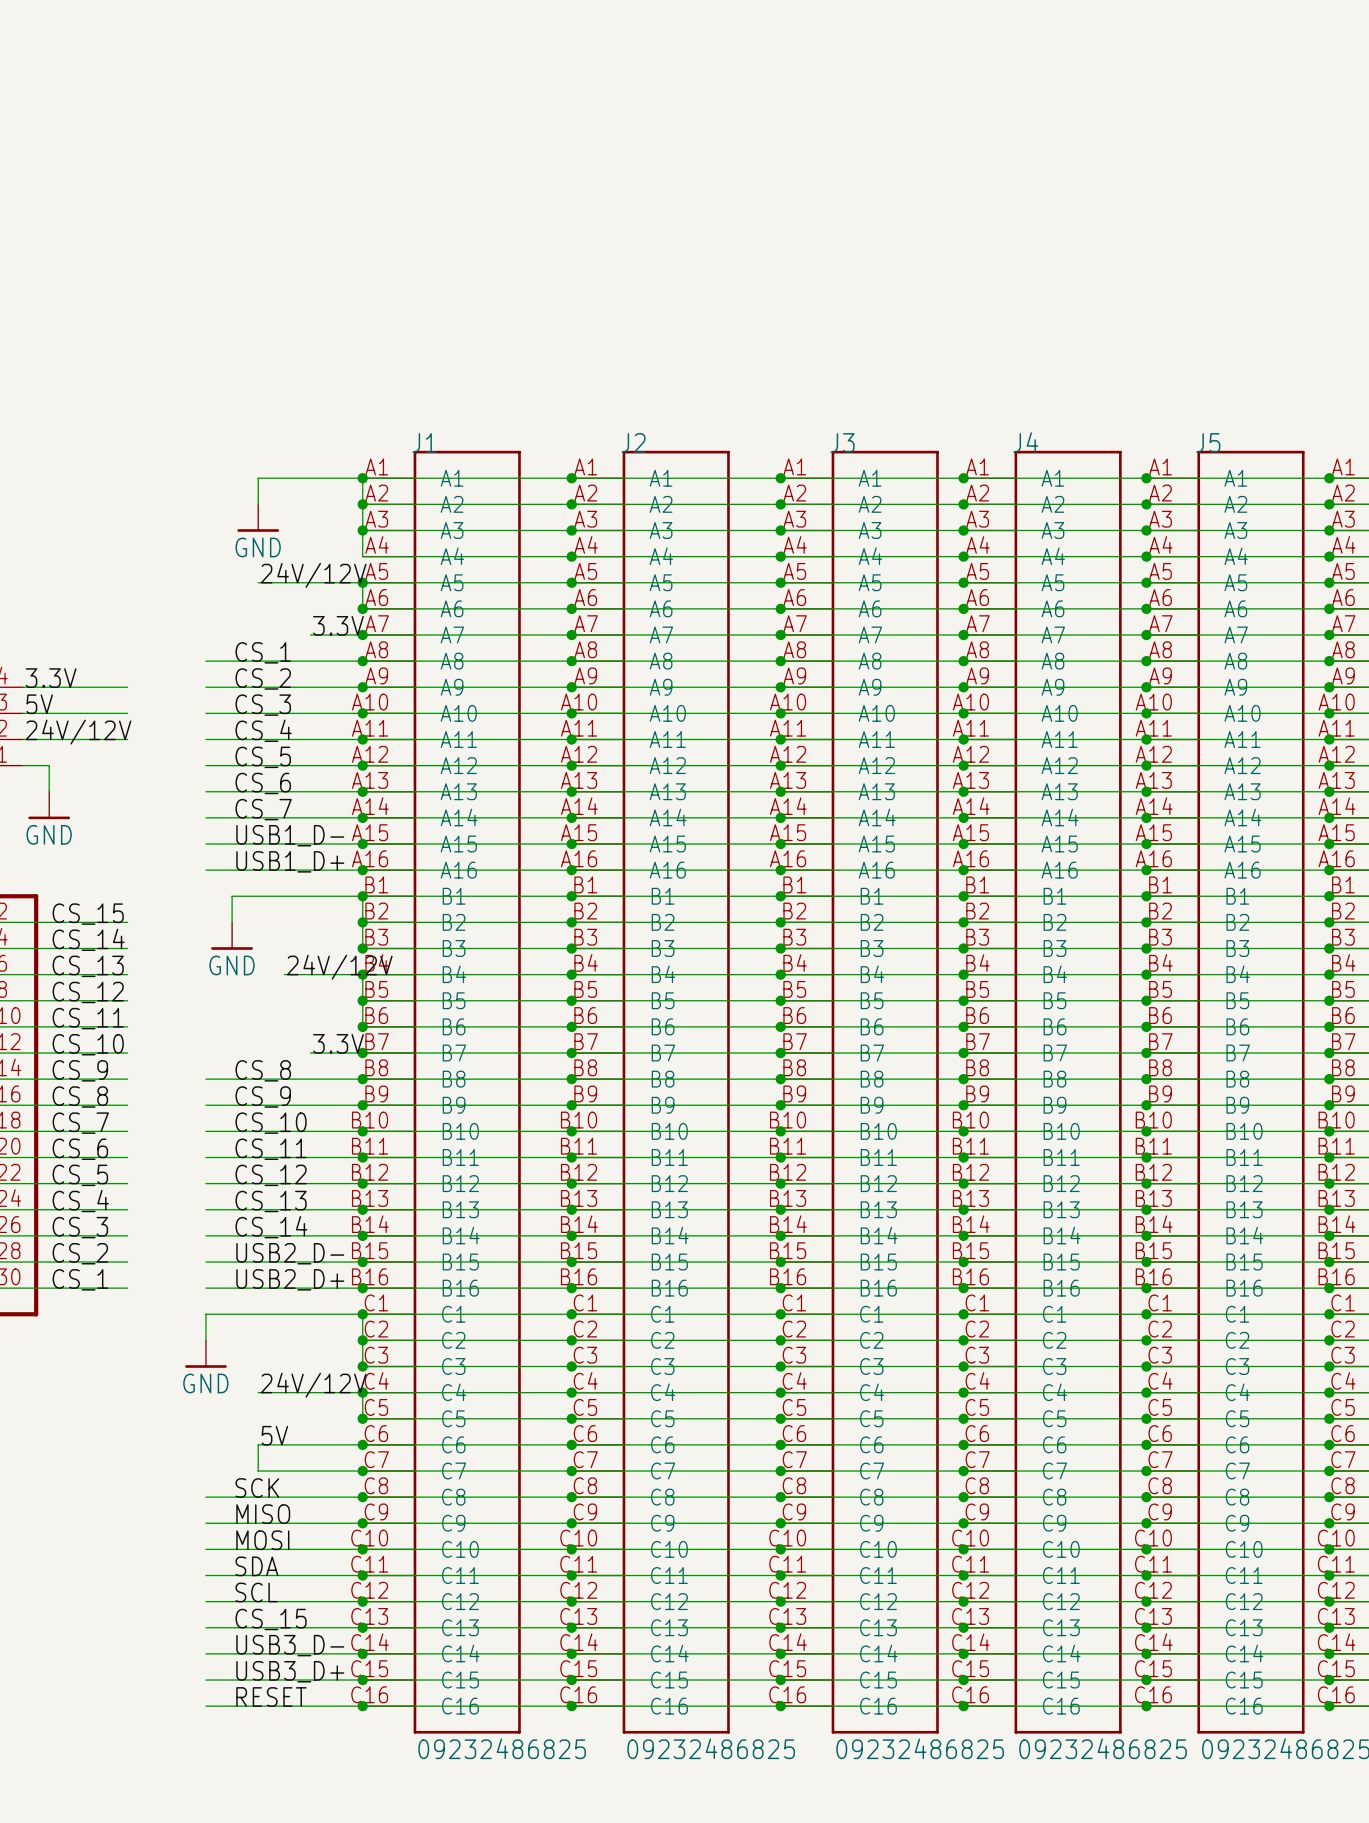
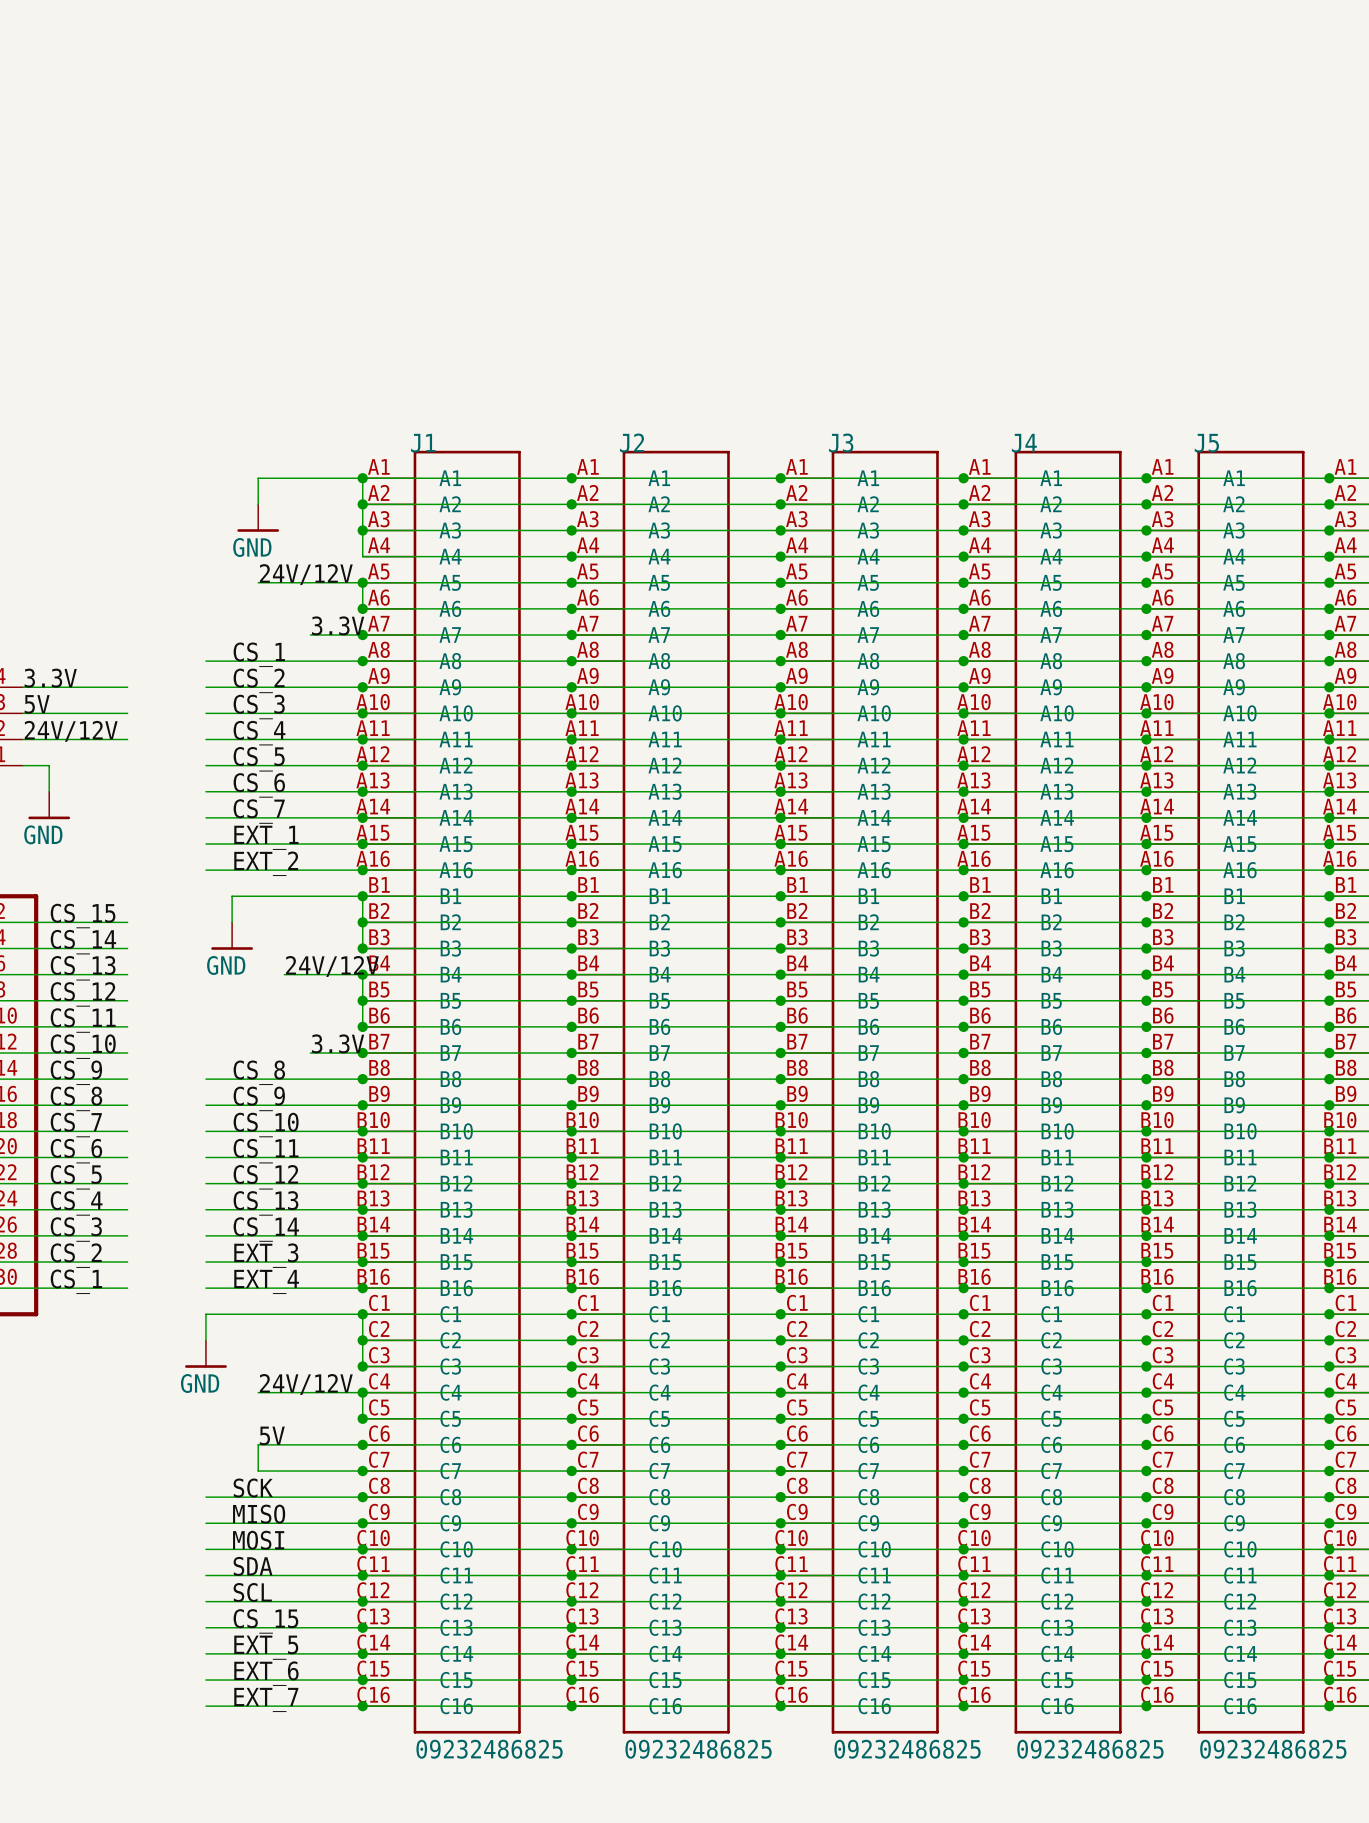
label: USB1_D- (290, 835) -> EXT_1 (266, 837)
label: USB1_D+ (290, 861) -> EXT_2 (266, 863)
label: USB2_D- (290, 1253) -> EXT_3 (266, 1255)
label: USB2_D+ (290, 1279) -> EXT_4 (266, 1281)
label: USB3_D- (290, 1645) -> EXT_5 (266, 1647)
label: USB3_D+ (290, 1671) -> EXT_6 (266, 1673)
label: RESET (271, 1696) -> EXT_7 (266, 1699)

